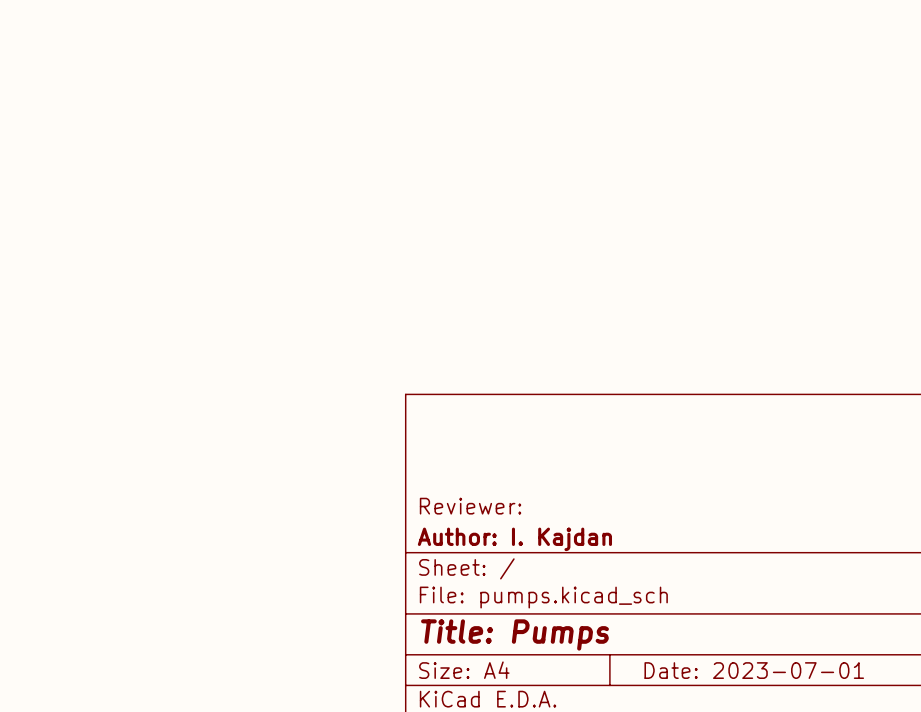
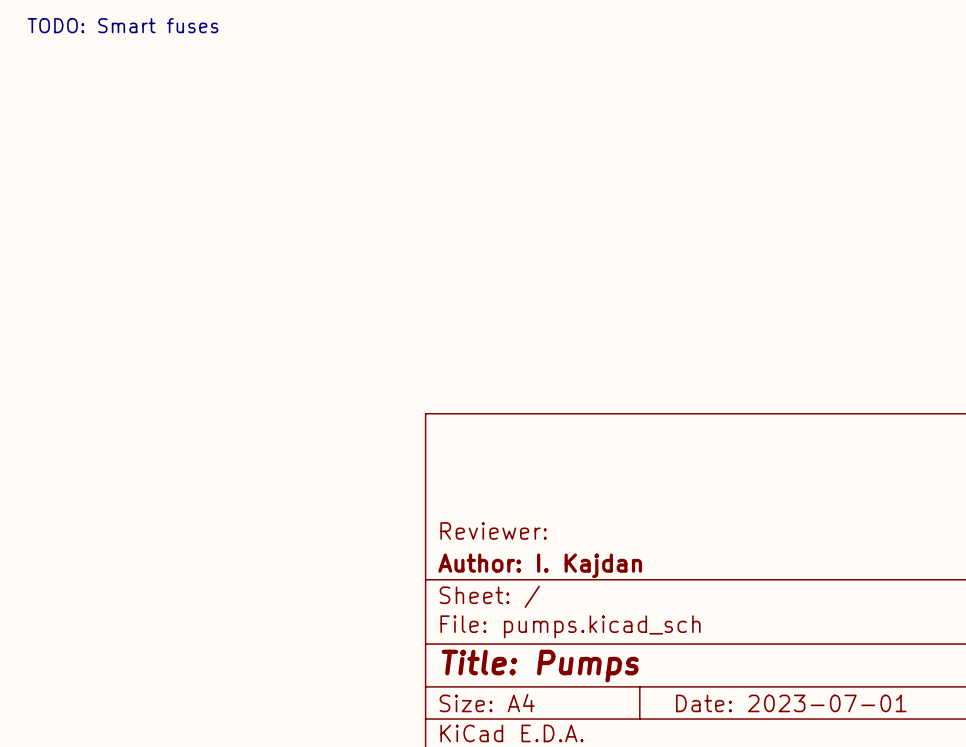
text: none -> TODO: Smart fuses (122, 25)

